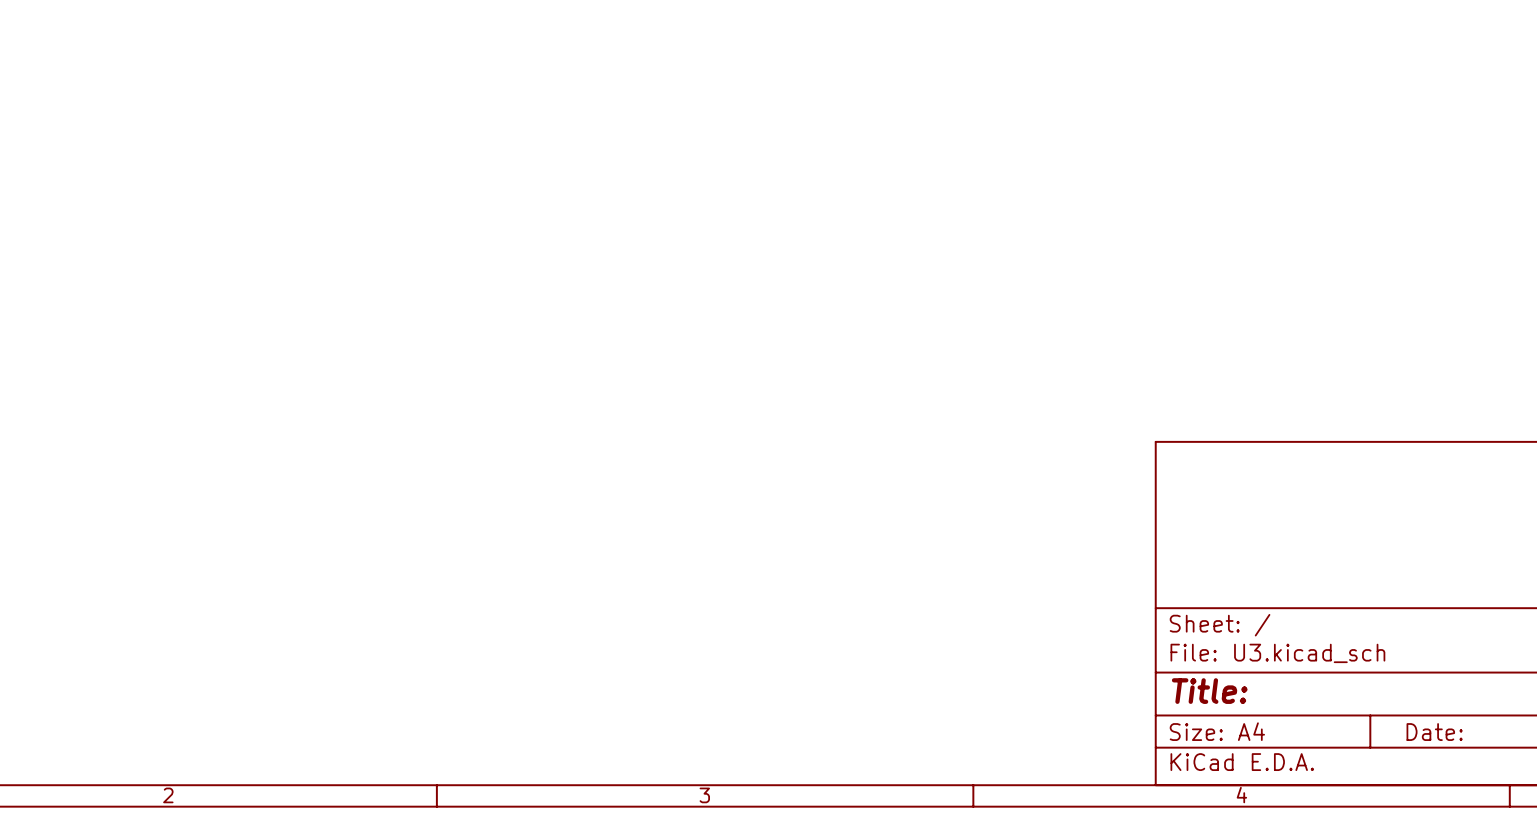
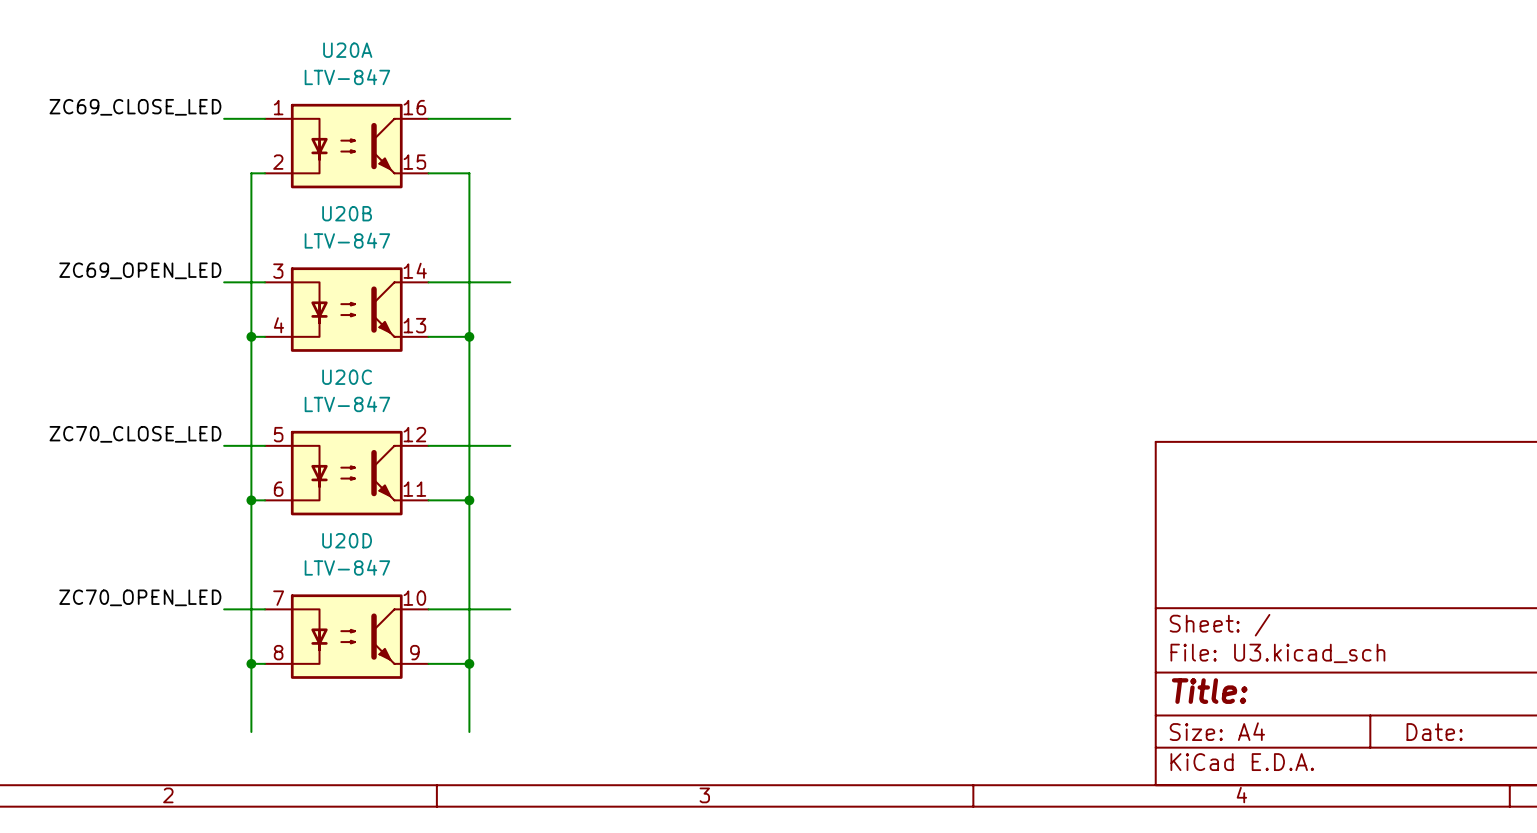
label: none -> ZC69_CLOSE_LED (135, 107)
wire: none -> (224, 118) (265, 118)
wire: none -> (428, 118) (510, 118)
U20A: none -> LTV-847 (346, 146)
wire: none -> (265, 173) (251, 173) (251, 731)
wire: none -> (428, 173) (469, 173) (469, 731)
label: none -> ZC69_OPEN_LED (140, 270)
wire: none -> (224, 282) (265, 282)
wire: none -> (428, 282) (510, 282)
U20B: none -> LTV-847 (346, 309)
wire: none -> (251, 336) (265, 336)
junction: none -> (251, 336)
wire: none -> (428, 336) (469, 336)
junction: none -> (469, 336)
label: none -> ZC70_CLOSE_LED (135, 434)
wire: none -> (224, 445) (265, 445)
wire: none -> (428, 445) (510, 445)
U20C: none -> LTV-847 (346, 473)
wire: none -> (251, 500) (265, 500)
junction: none -> (251, 500)
wire: none -> (428, 500) (469, 500)
junction: none -> (469, 500)
label: none -> ZC70_OPEN_LED (140, 597)
wire: none -> (224, 609) (265, 609)
wire: none -> (428, 609) (510, 609)
U20D: none -> LTV-847 (346, 636)
wire: none -> (251, 663) (265, 663)
junction: none -> (251, 663)
wire: none -> (428, 663) (469, 663)
junction: none -> (469, 663)

